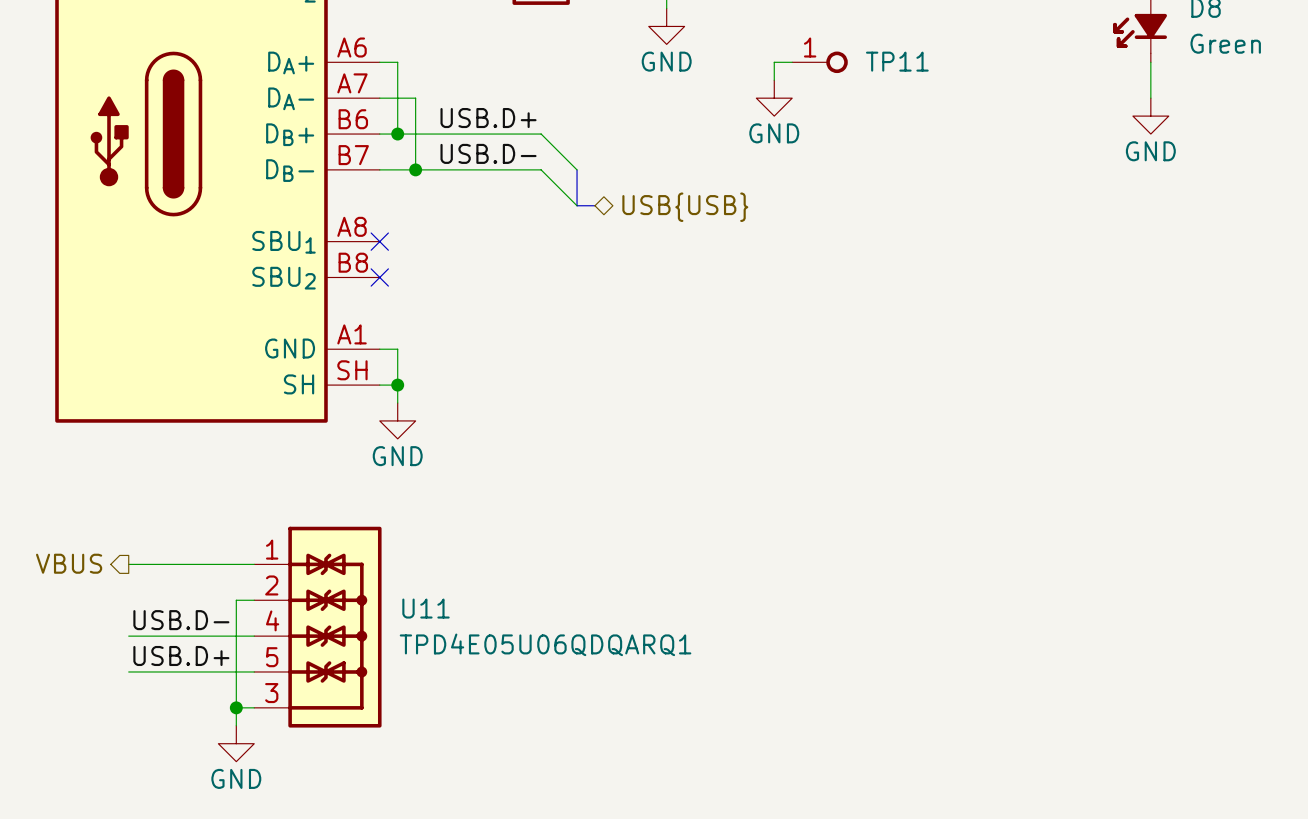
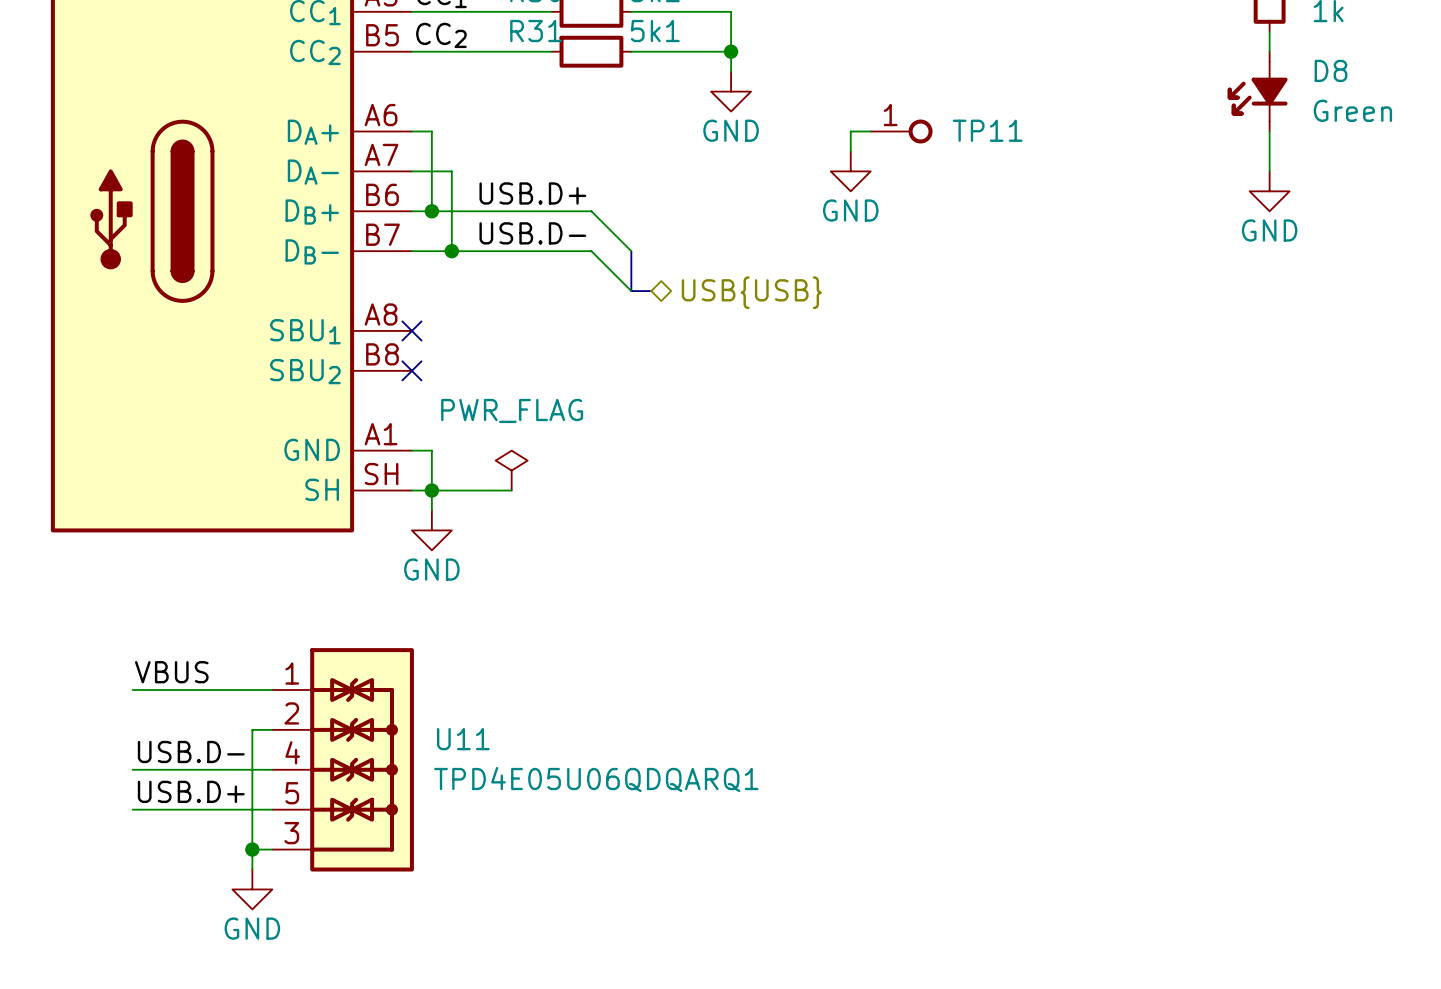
power symbol: none -> PWR_FLAG (511, 470)
wire: none -> (431, 490) (511, 490)
label: none -> VBUS (171, 672)
hierarchical label: VBUS (69, 563) -> none

